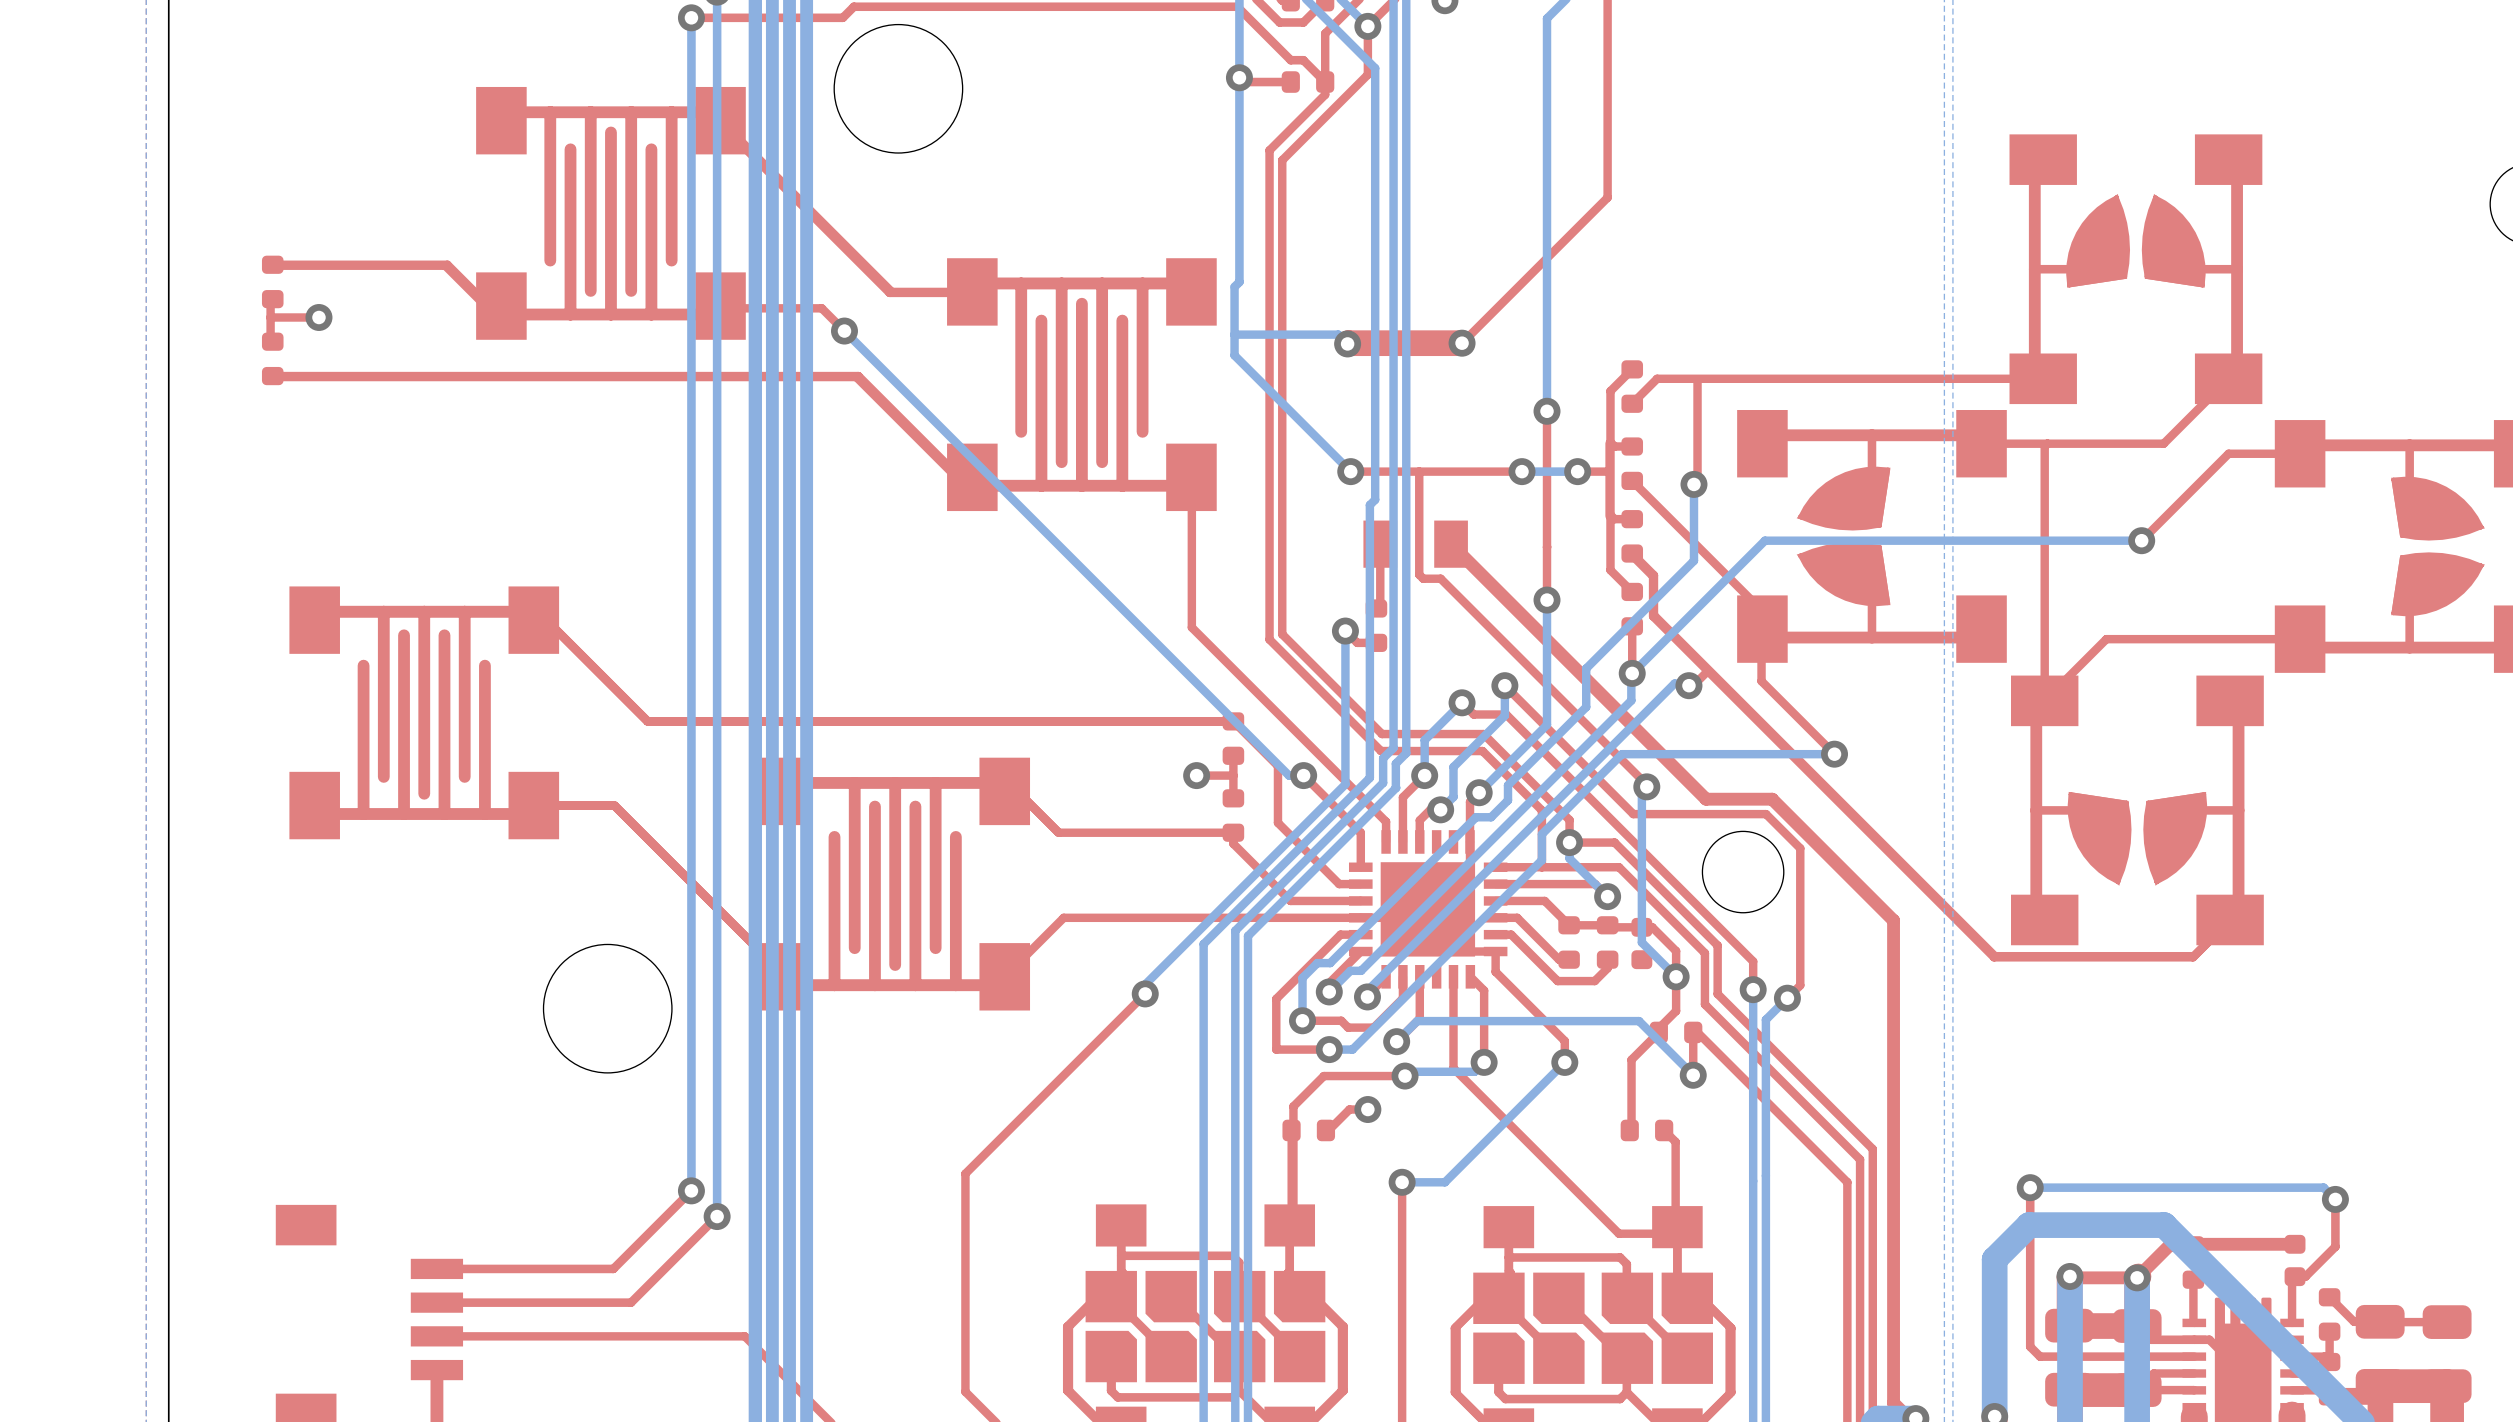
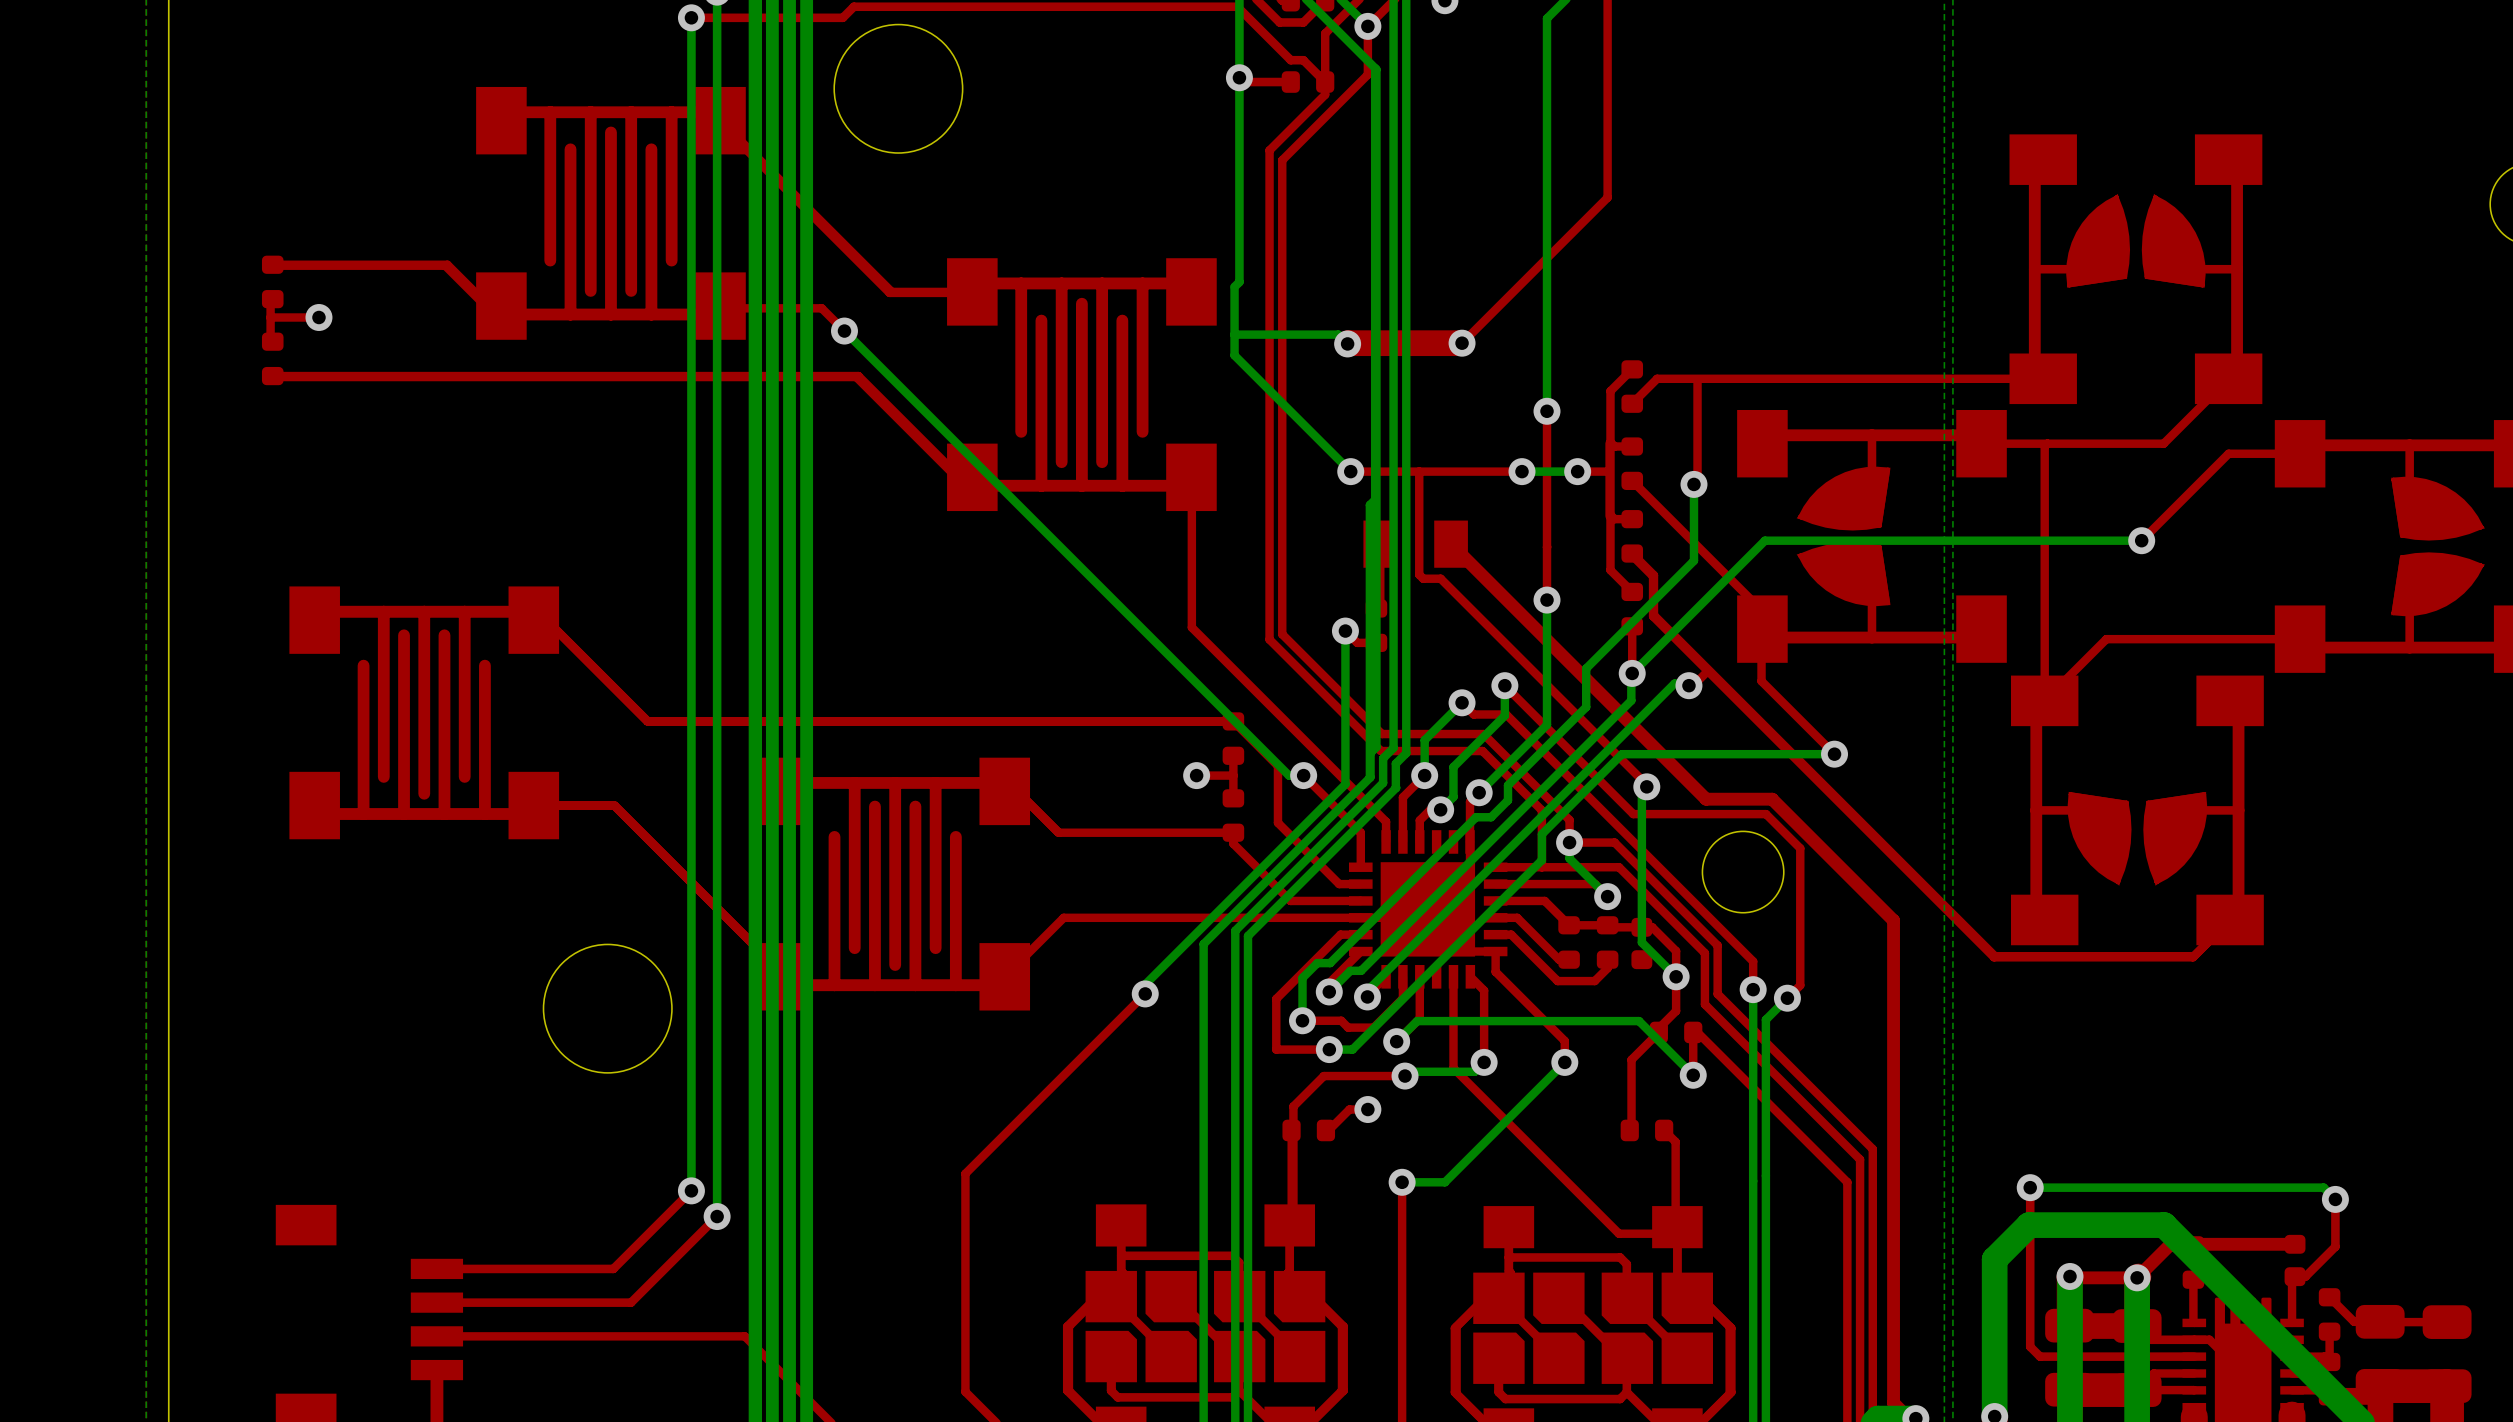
bottom track: none -> (1375, 68) (1376, 747) (1370, 753) (1369, 777)

